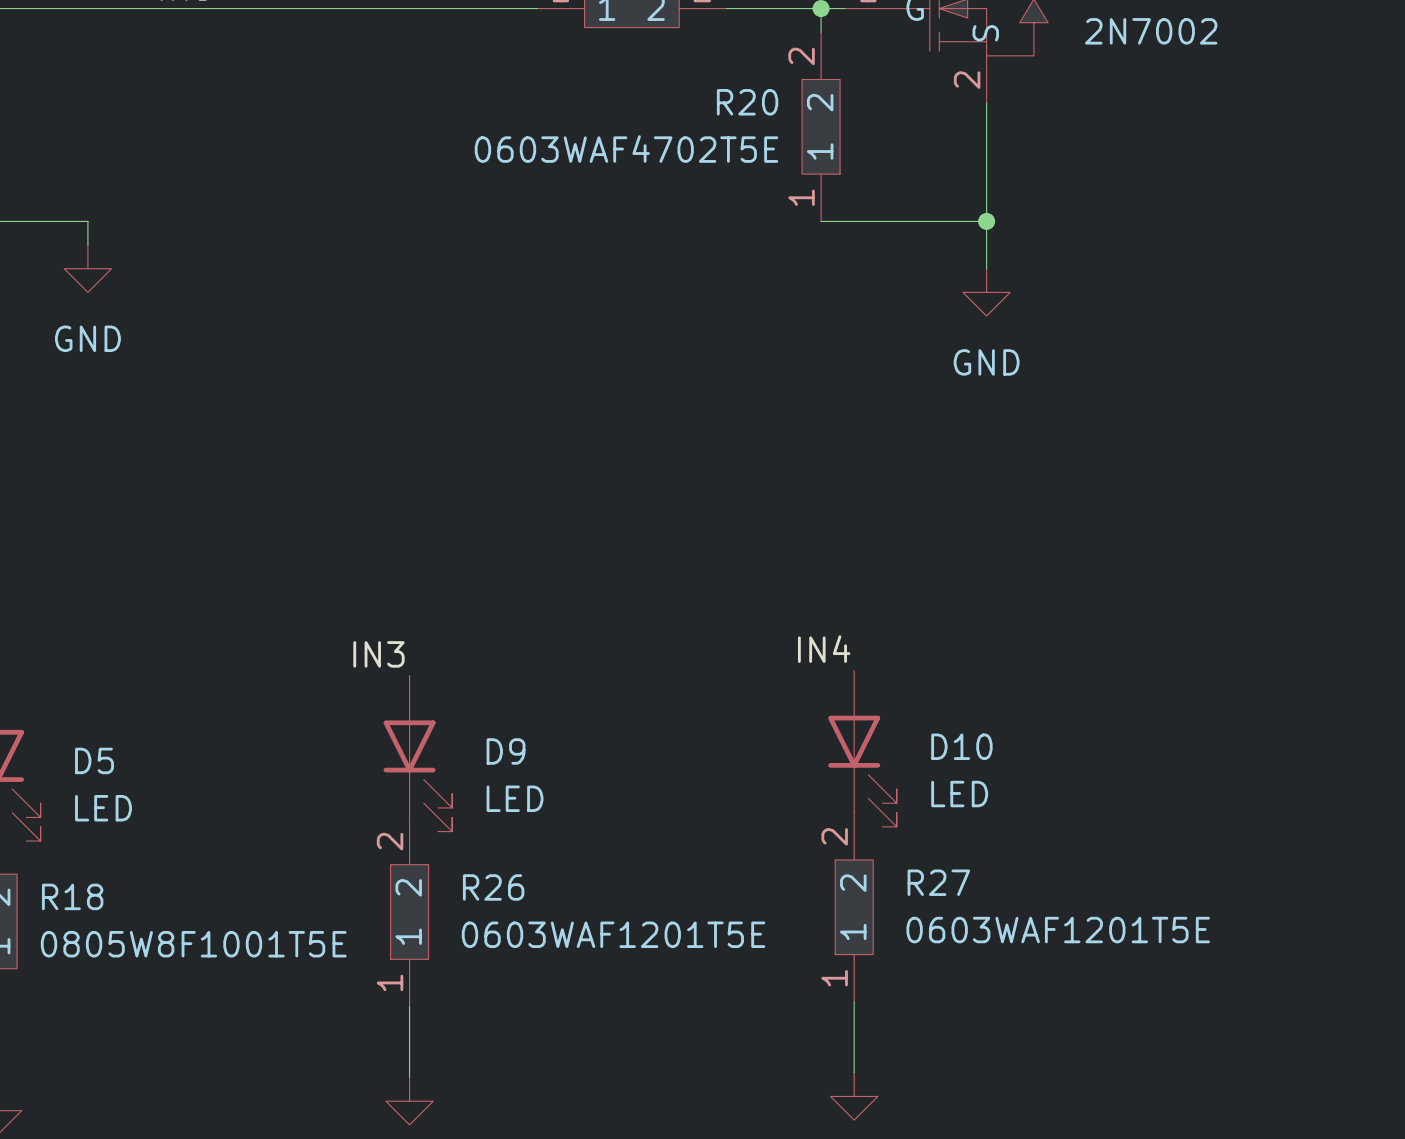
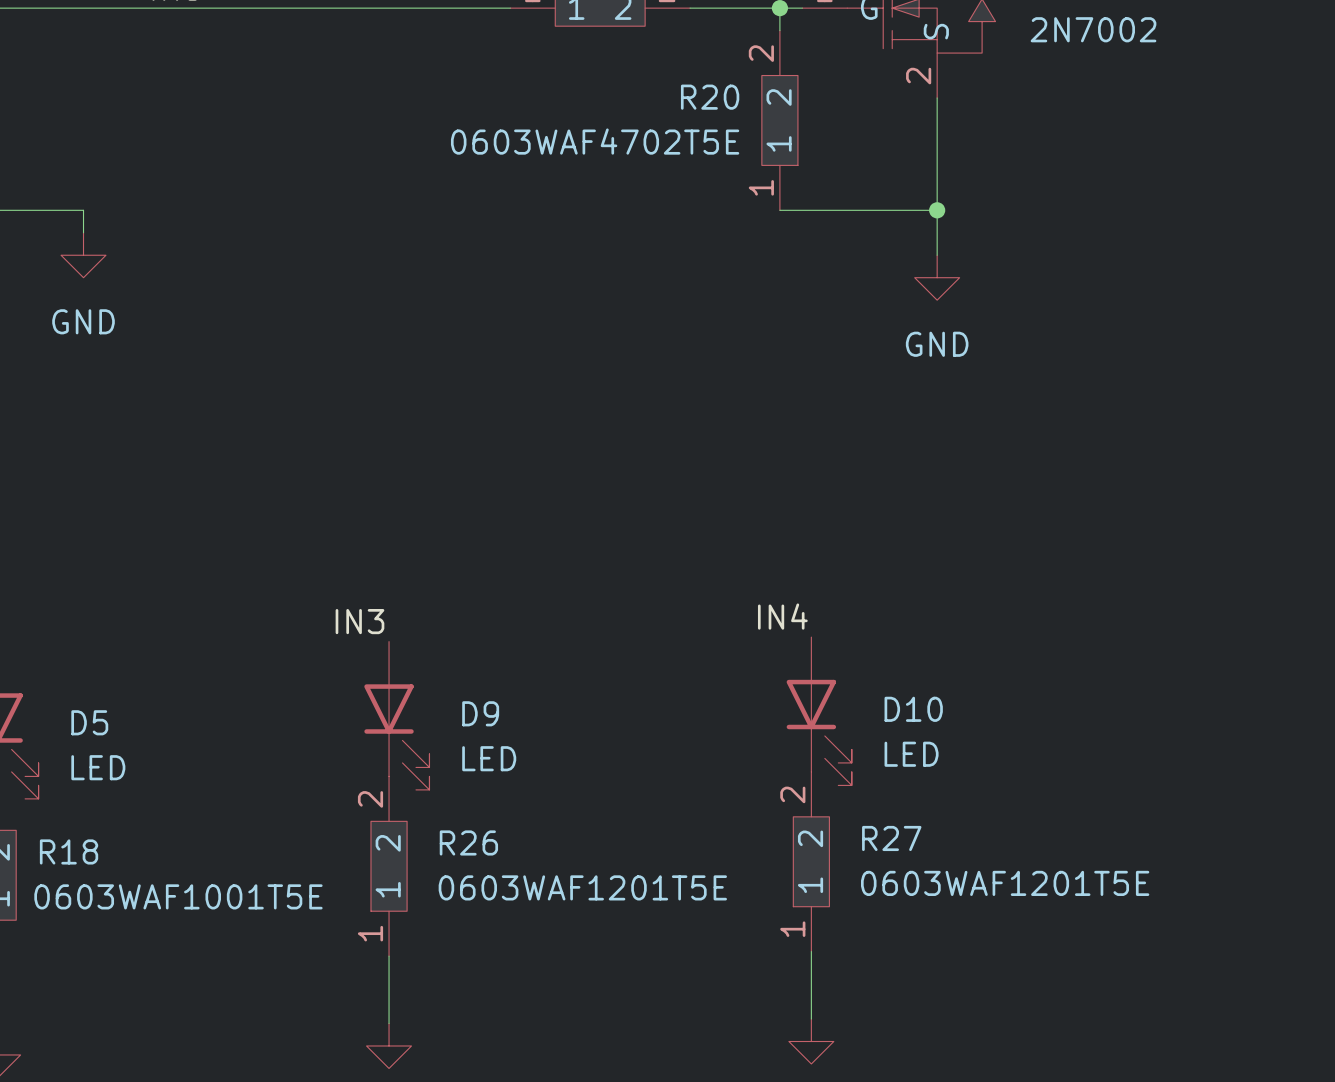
R18 value: 0805W8F1001T5E (193, 944) -> 0603WAF1001T5E (178, 896)

